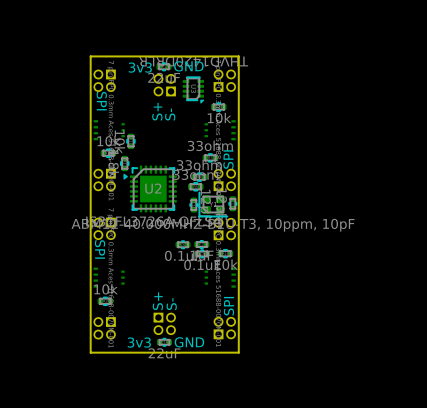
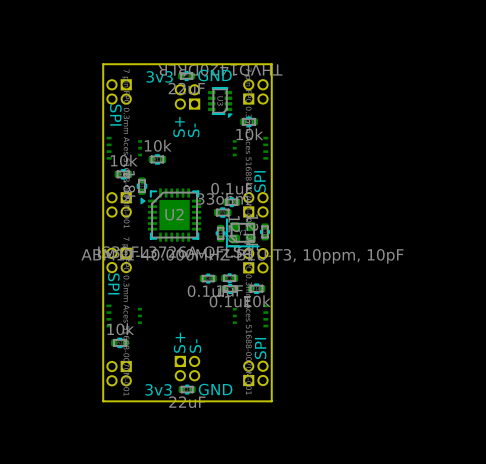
part rotation: 0° (130, 141) -> 90° clockwise (157, 159)
part: 33ohm (210, 157) -> none
part: 33ohm (199, 177) -> none
part: none -> 0.1uF (231, 202)

